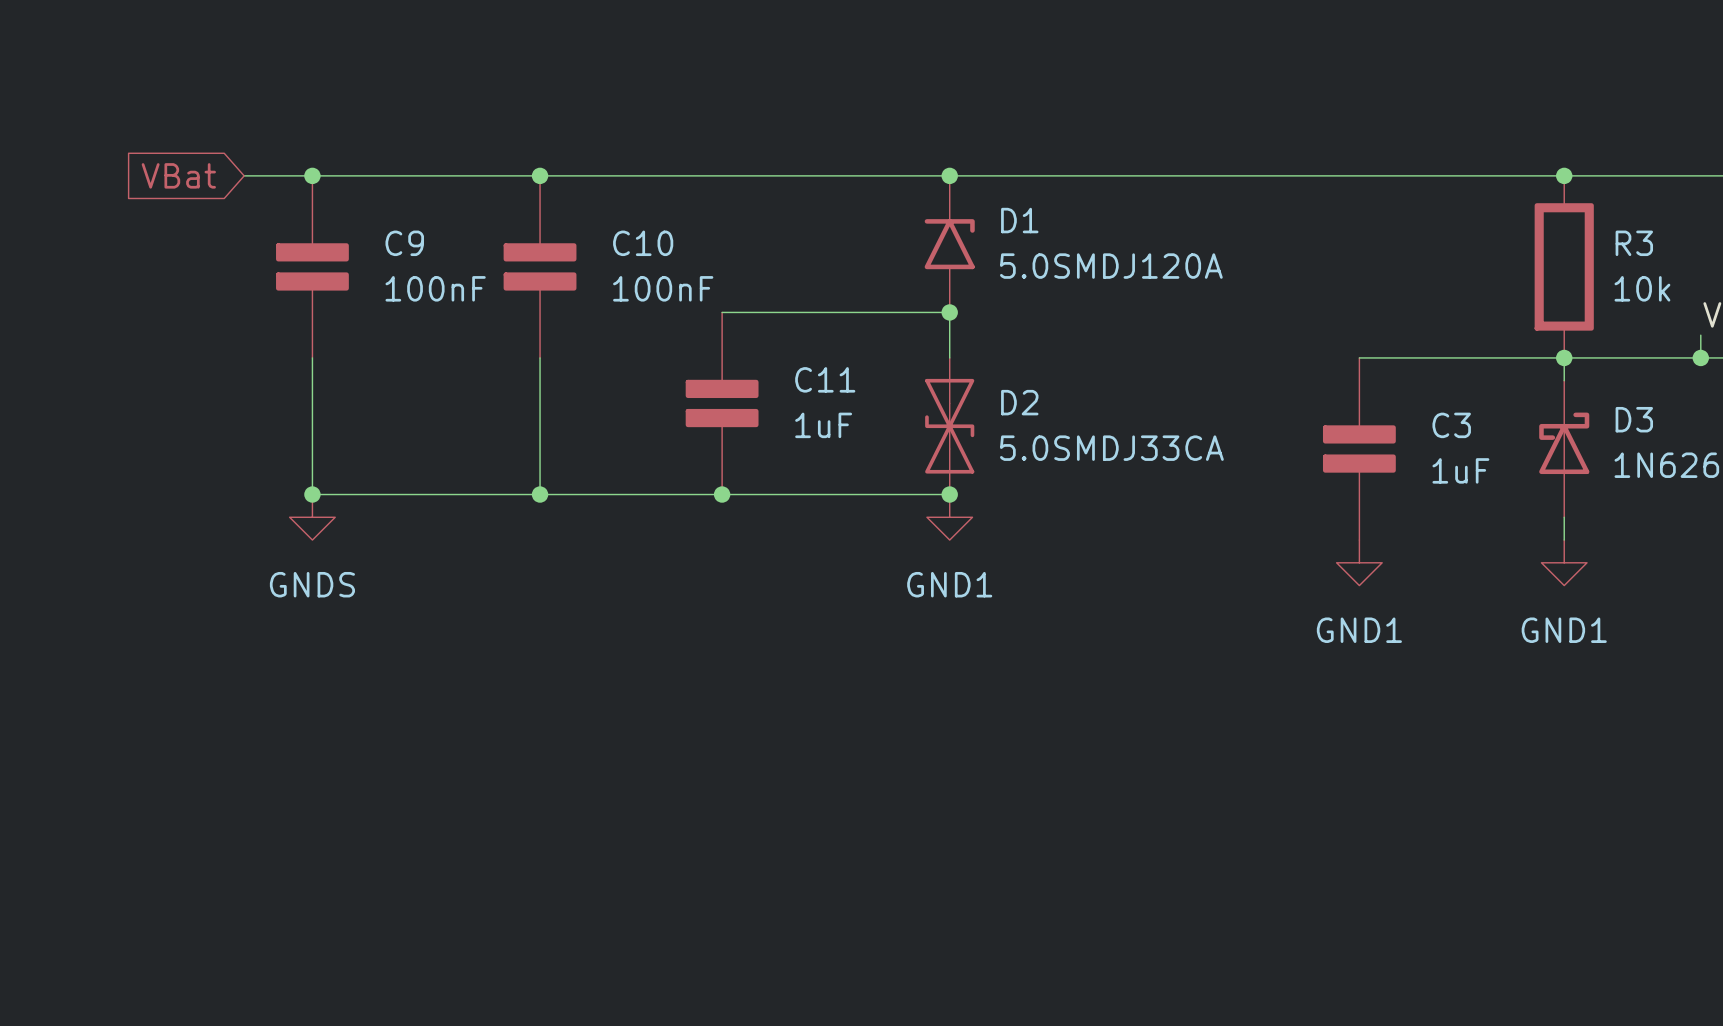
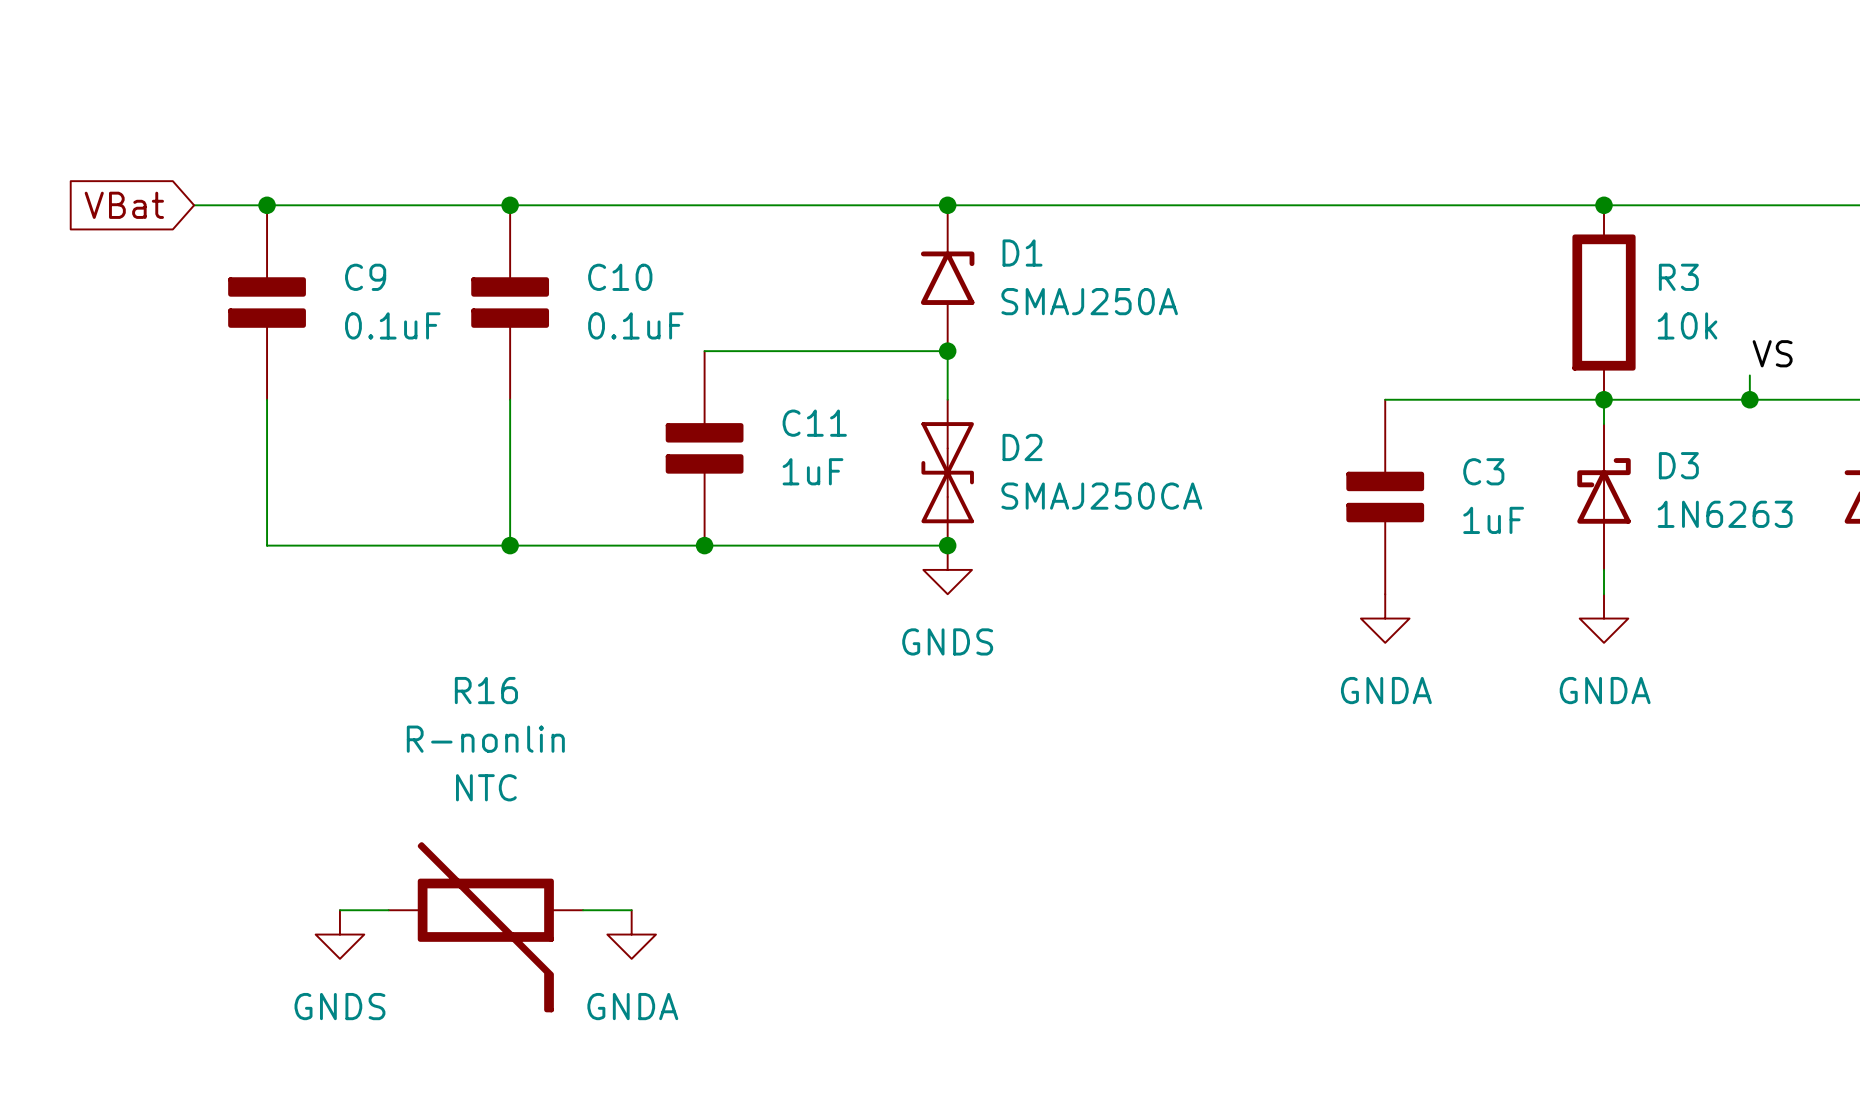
D1 value: 5.0SMDJ120A (1111, 266) -> SMAJ250A (1089, 301)
C9 value: 100nF (435, 288) -> 0.1uF (392, 325)
C10 value: 100nF (663, 288) -> 0.1uF (635, 325)
D2 value: 5.0SMDJ33CA (1111, 448) -> SMAJ250CA (1101, 496)
junction: (312, 494) -> none
power symbol position: GNDS (312, 517) -> GNDS (339, 934)
power symbol: GND1 (949, 517) -> GNDS (947, 569)
power symbol: GND1 (1359, 562) -> GNDA (1385, 618)
power symbol: GND1 (1564, 562) -> GNDA (1604, 618)
wire: none -> (339, 910) (388, 910)
wire: none -> (583, 910) (631, 910)
R16: none -> R-nonlin (485, 927)
power symbol: none -> GNDA (631, 934)

